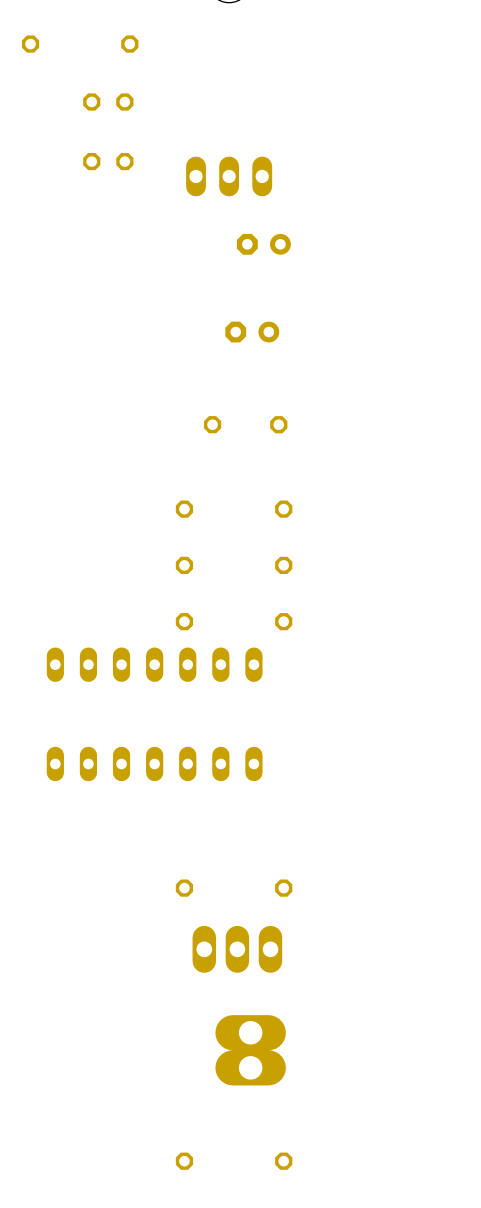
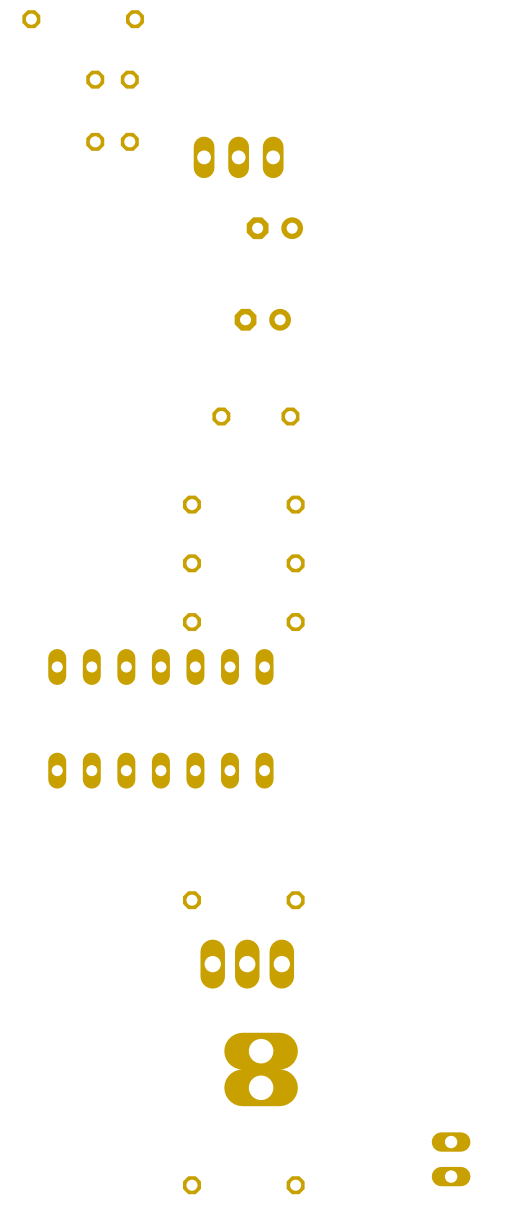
part: none -> (451, 1159)

